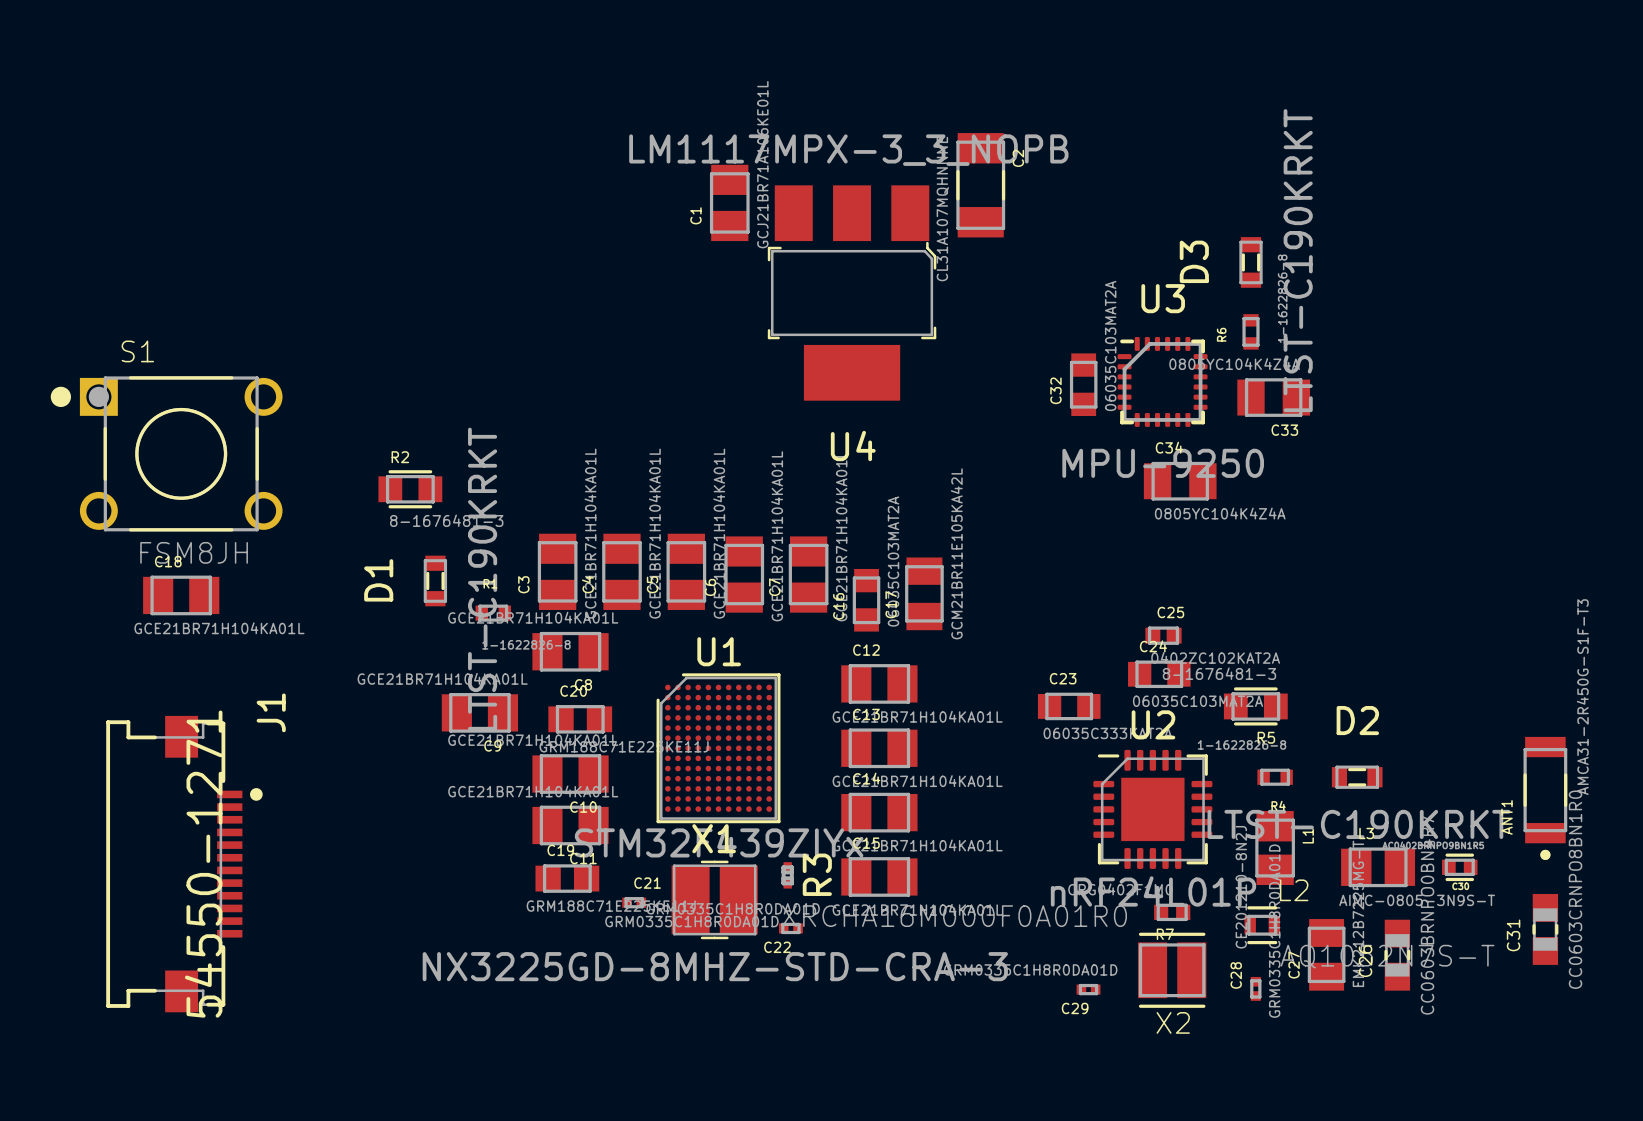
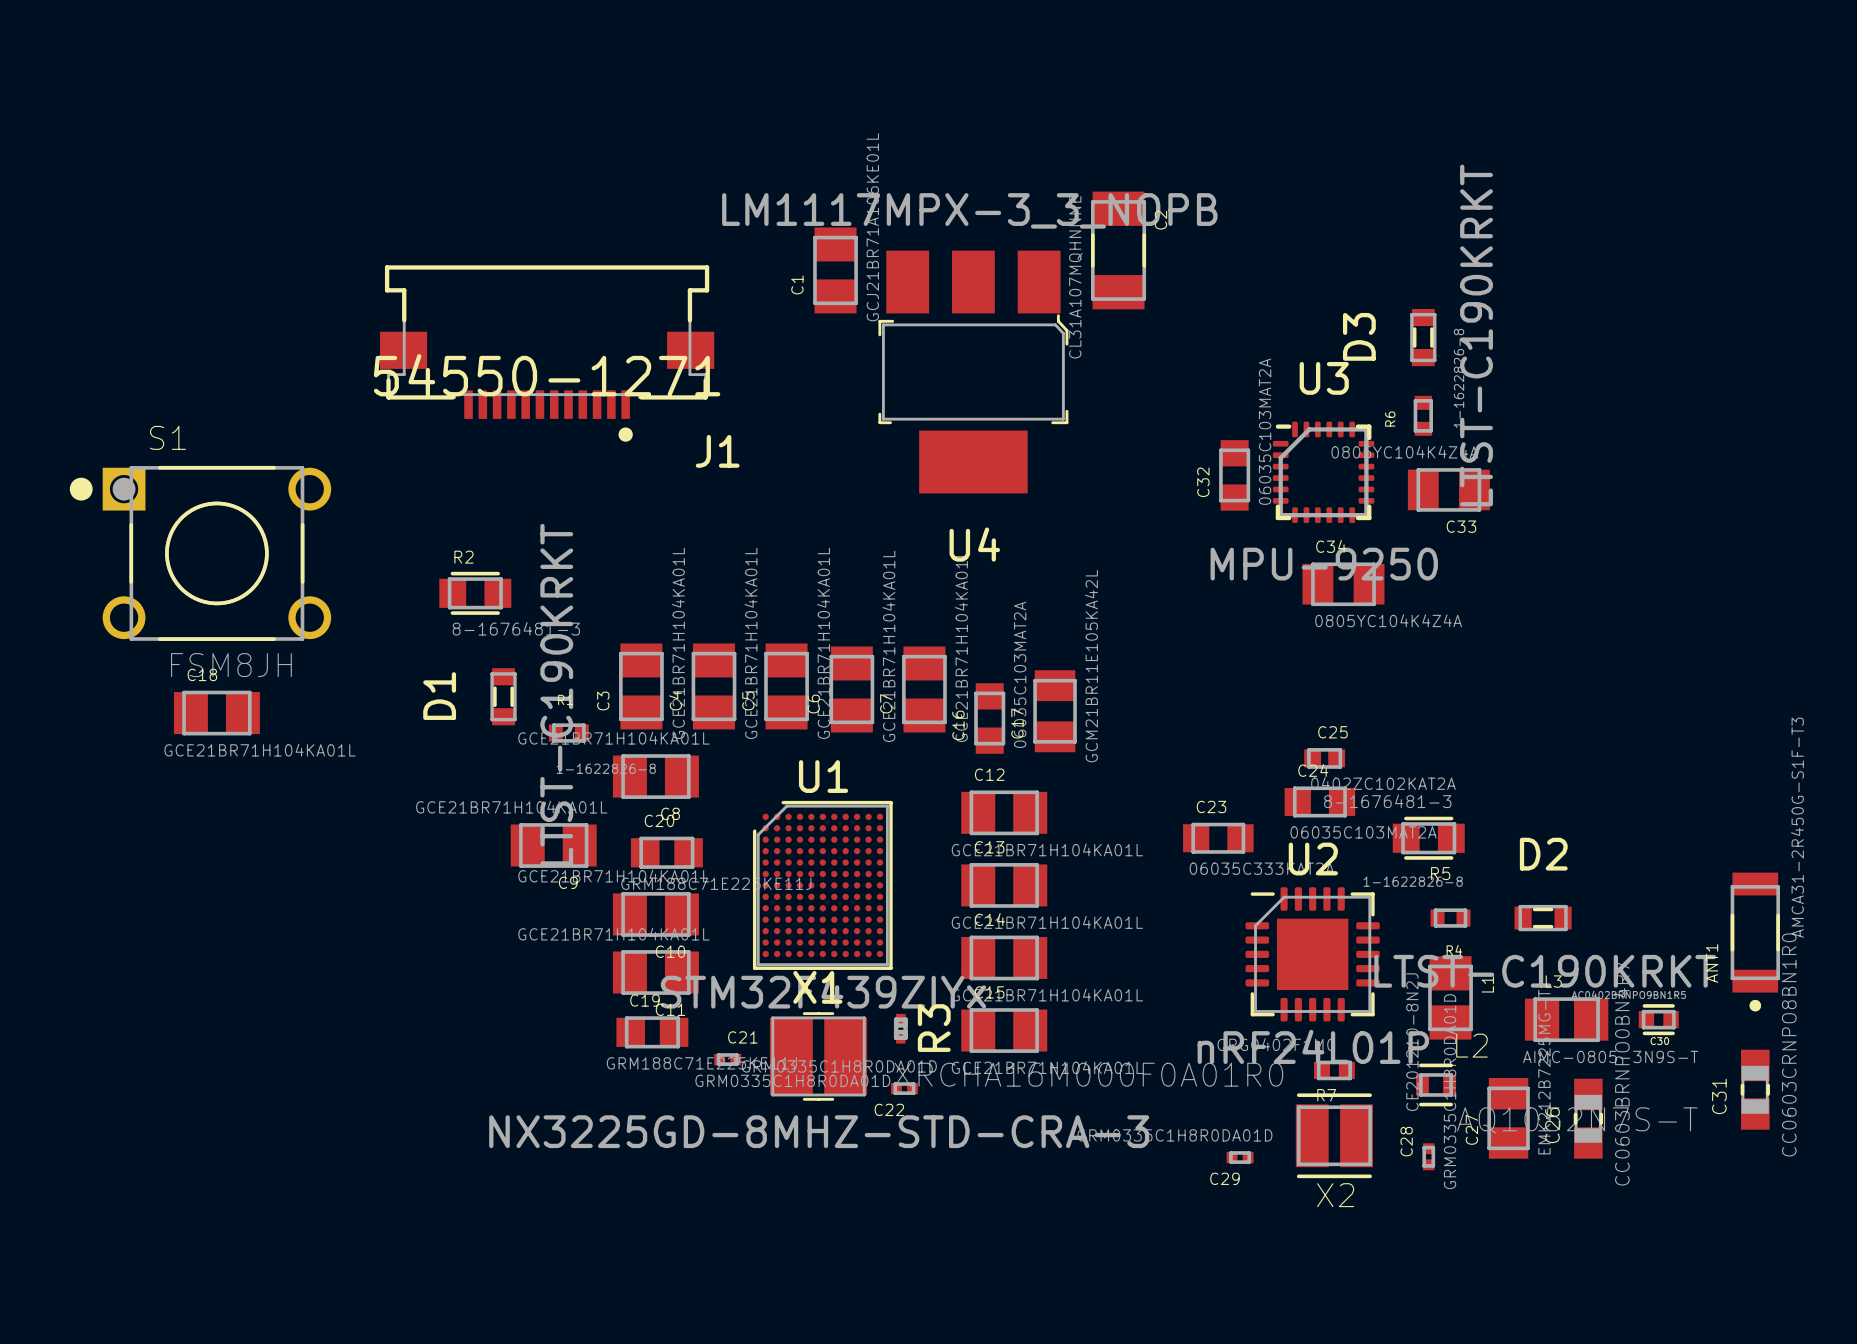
J1 rotation: 0° (184, 864) -> 90° clockwise (547, 353)
J1 position: (184, 864) -> (547, 353)

